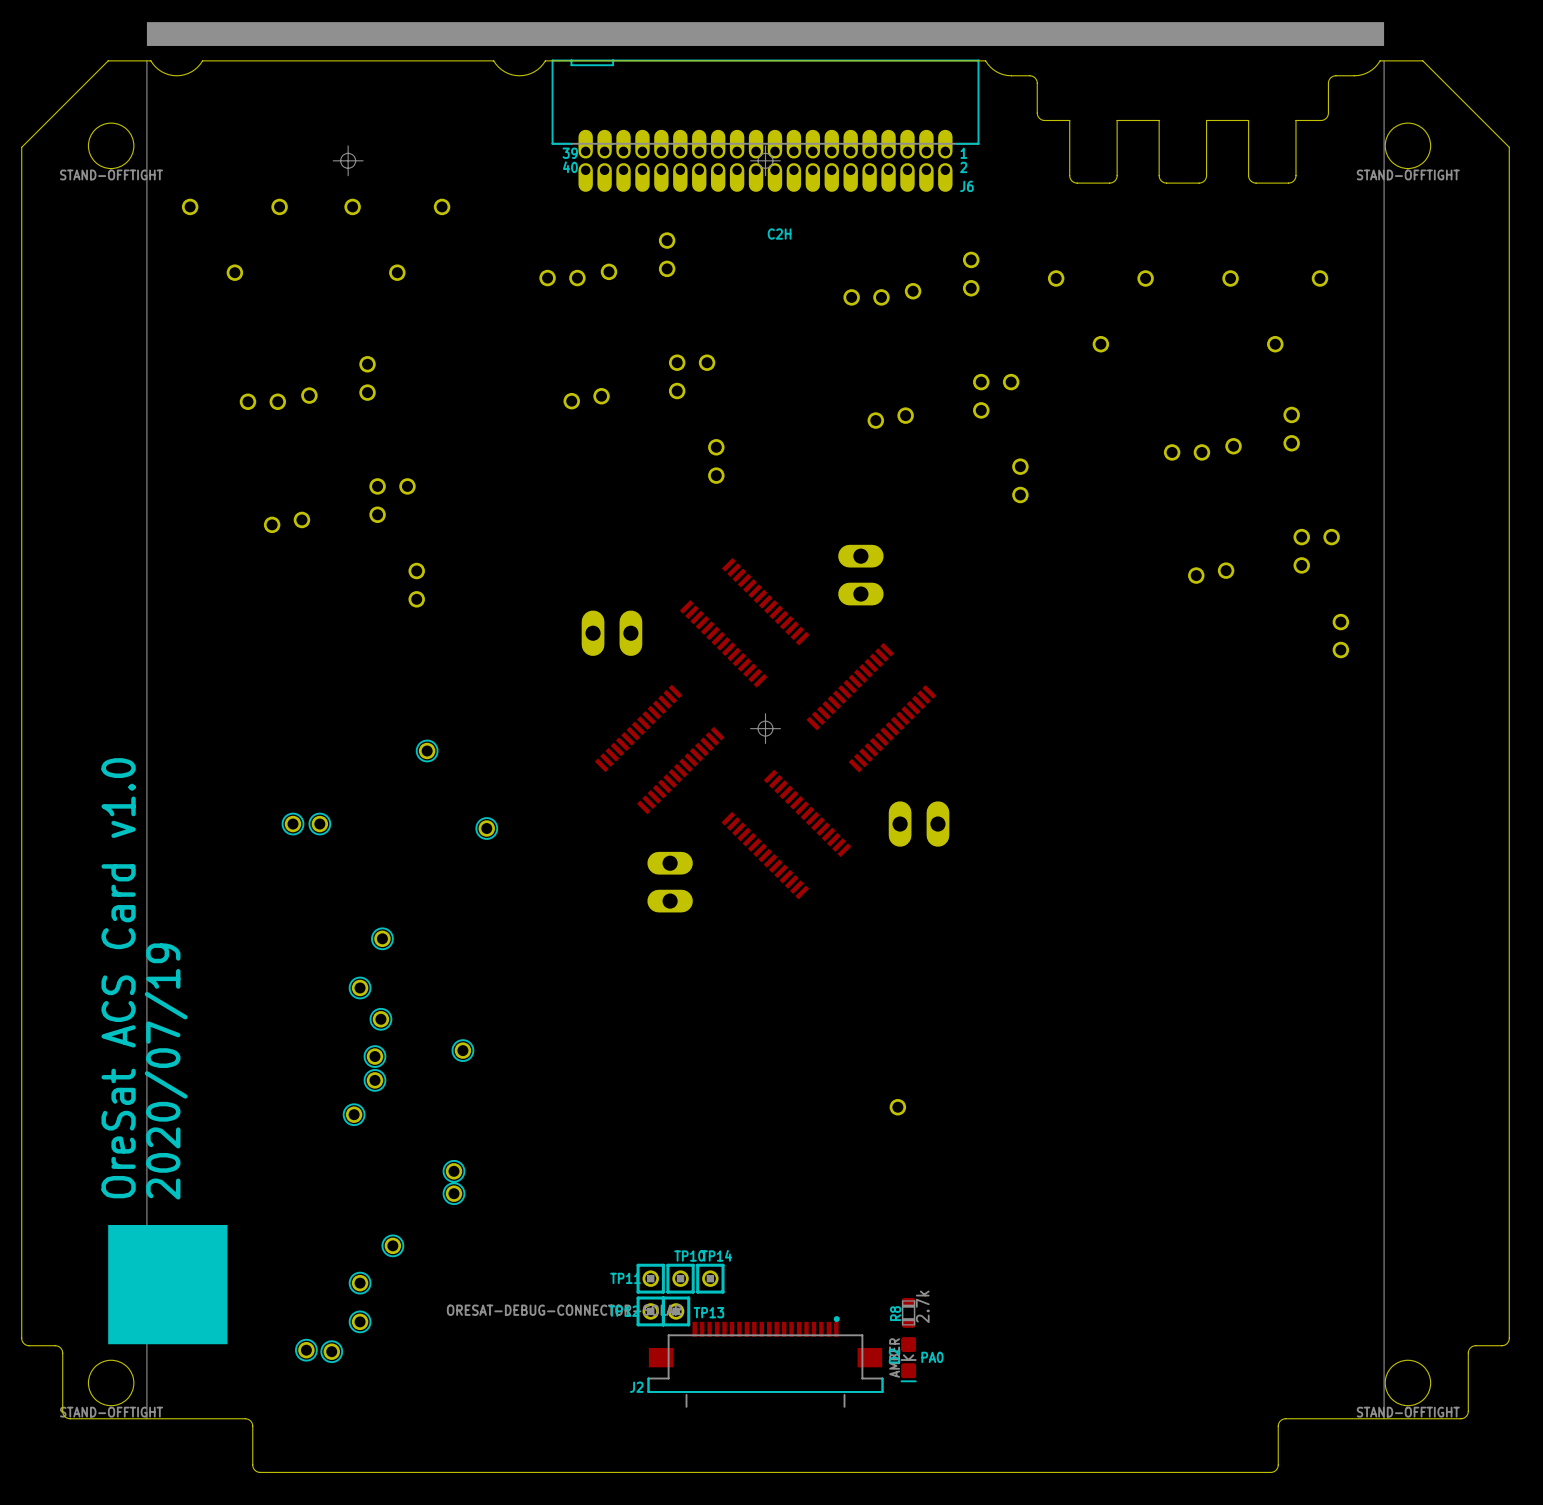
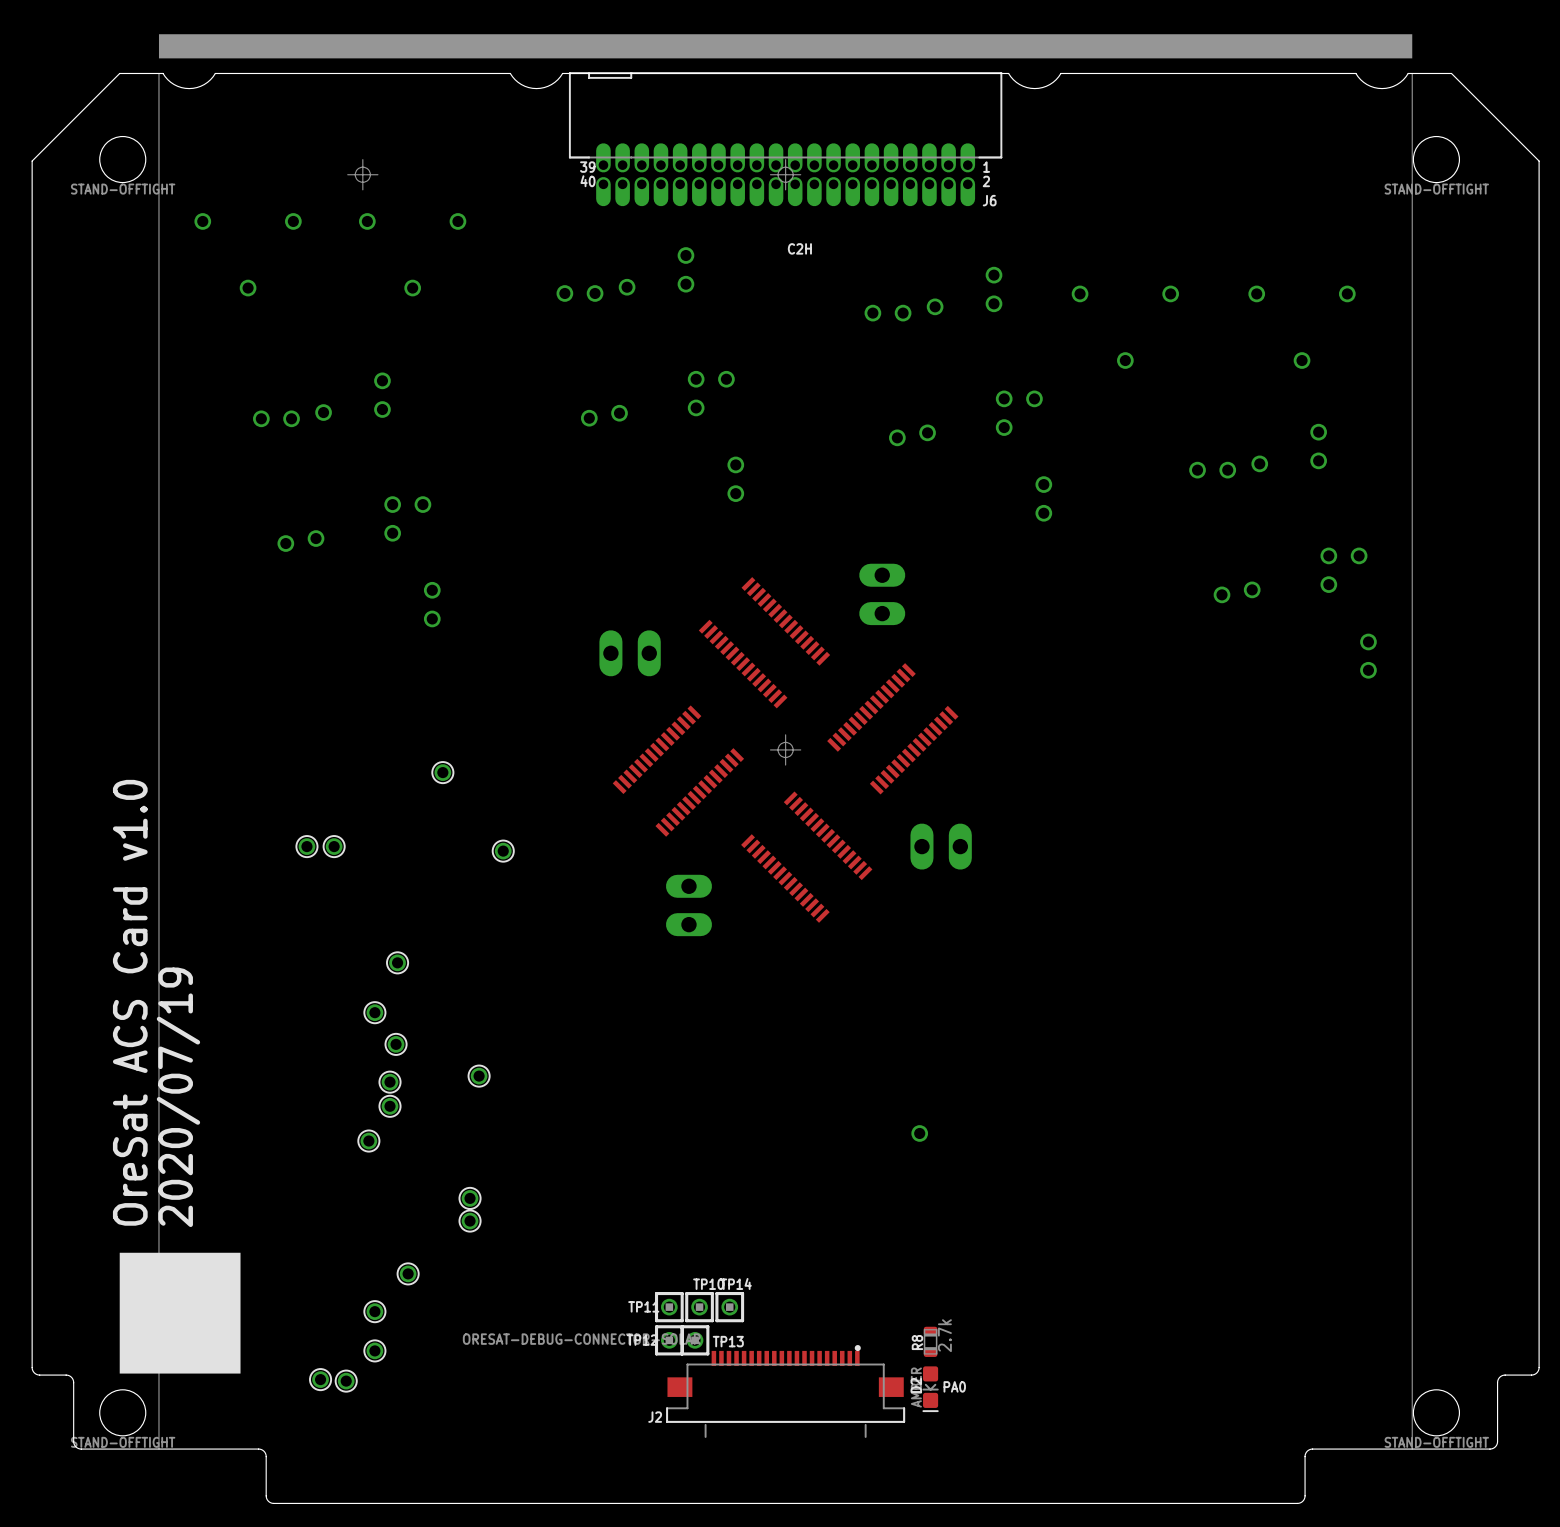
drawing shape: [21, 22, 1510, 1473] -> [32, 34, 1540, 1504]

